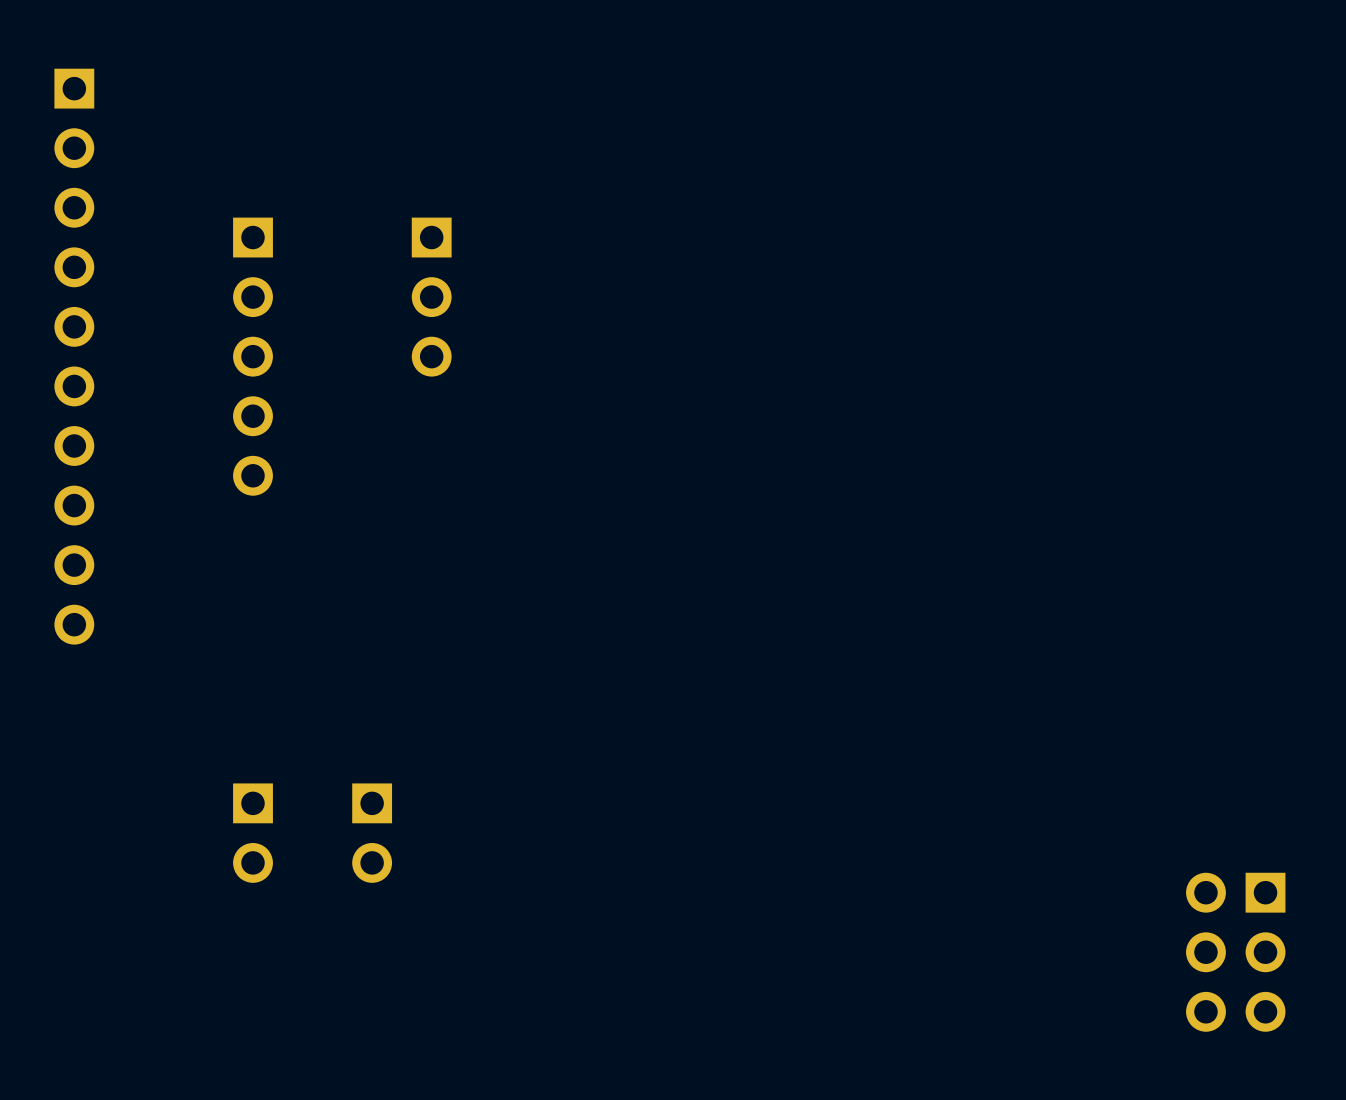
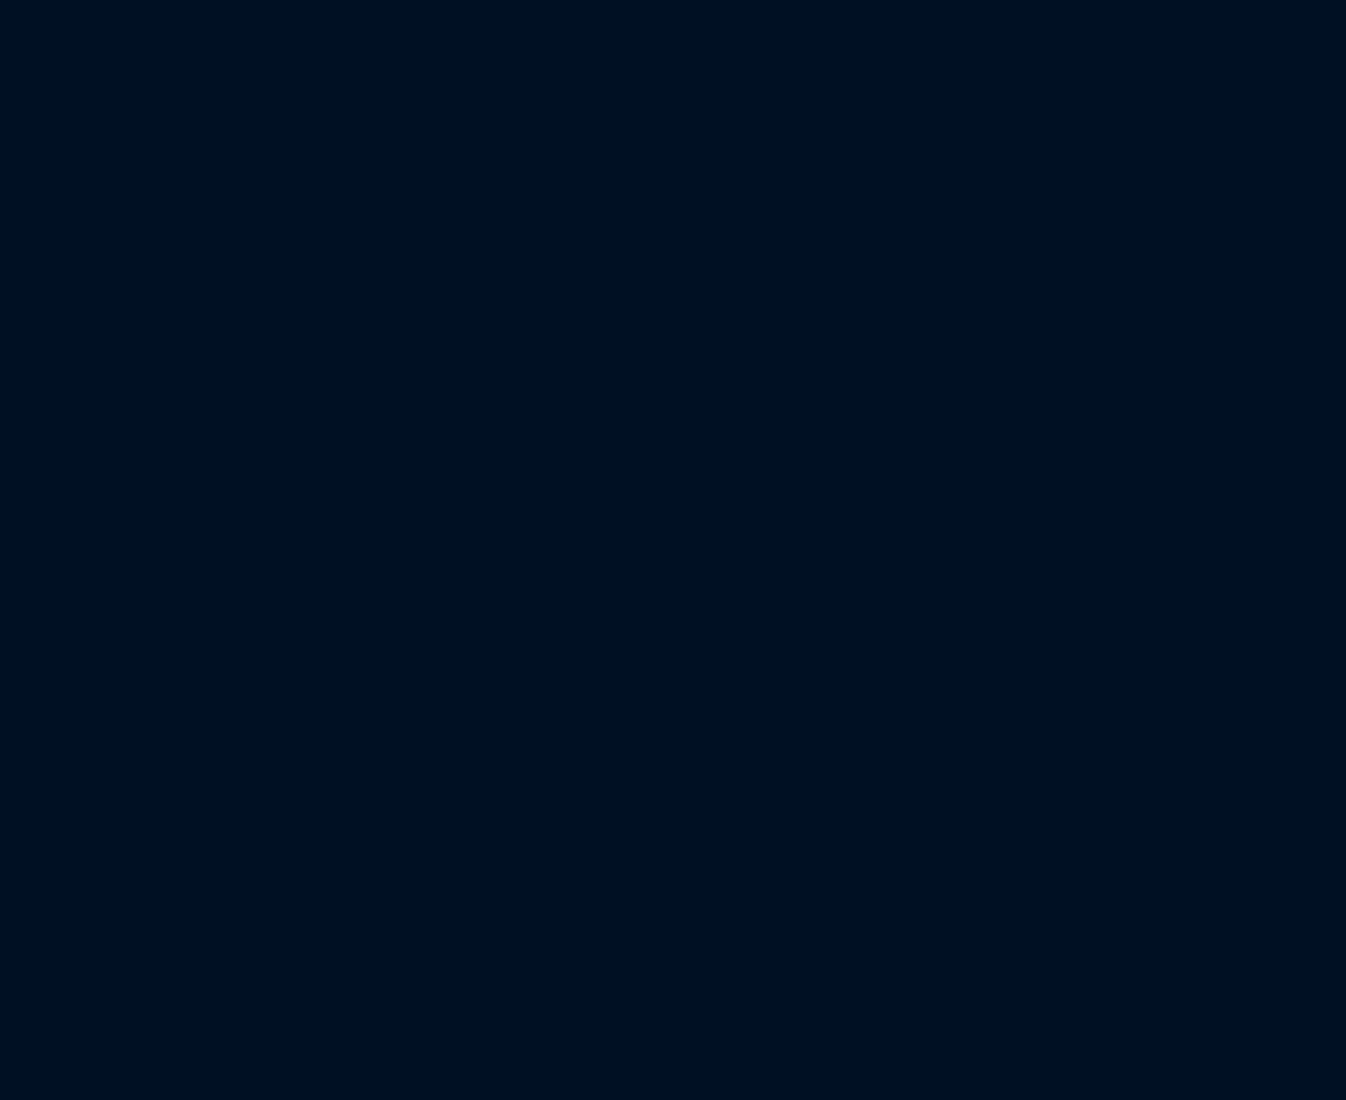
part: (431, 297) -> none
part: (74, 356) -> none
part: (253, 356) -> none
part: (253, 833) -> none
part: (372, 833) -> none
part: (1235, 952) -> none

